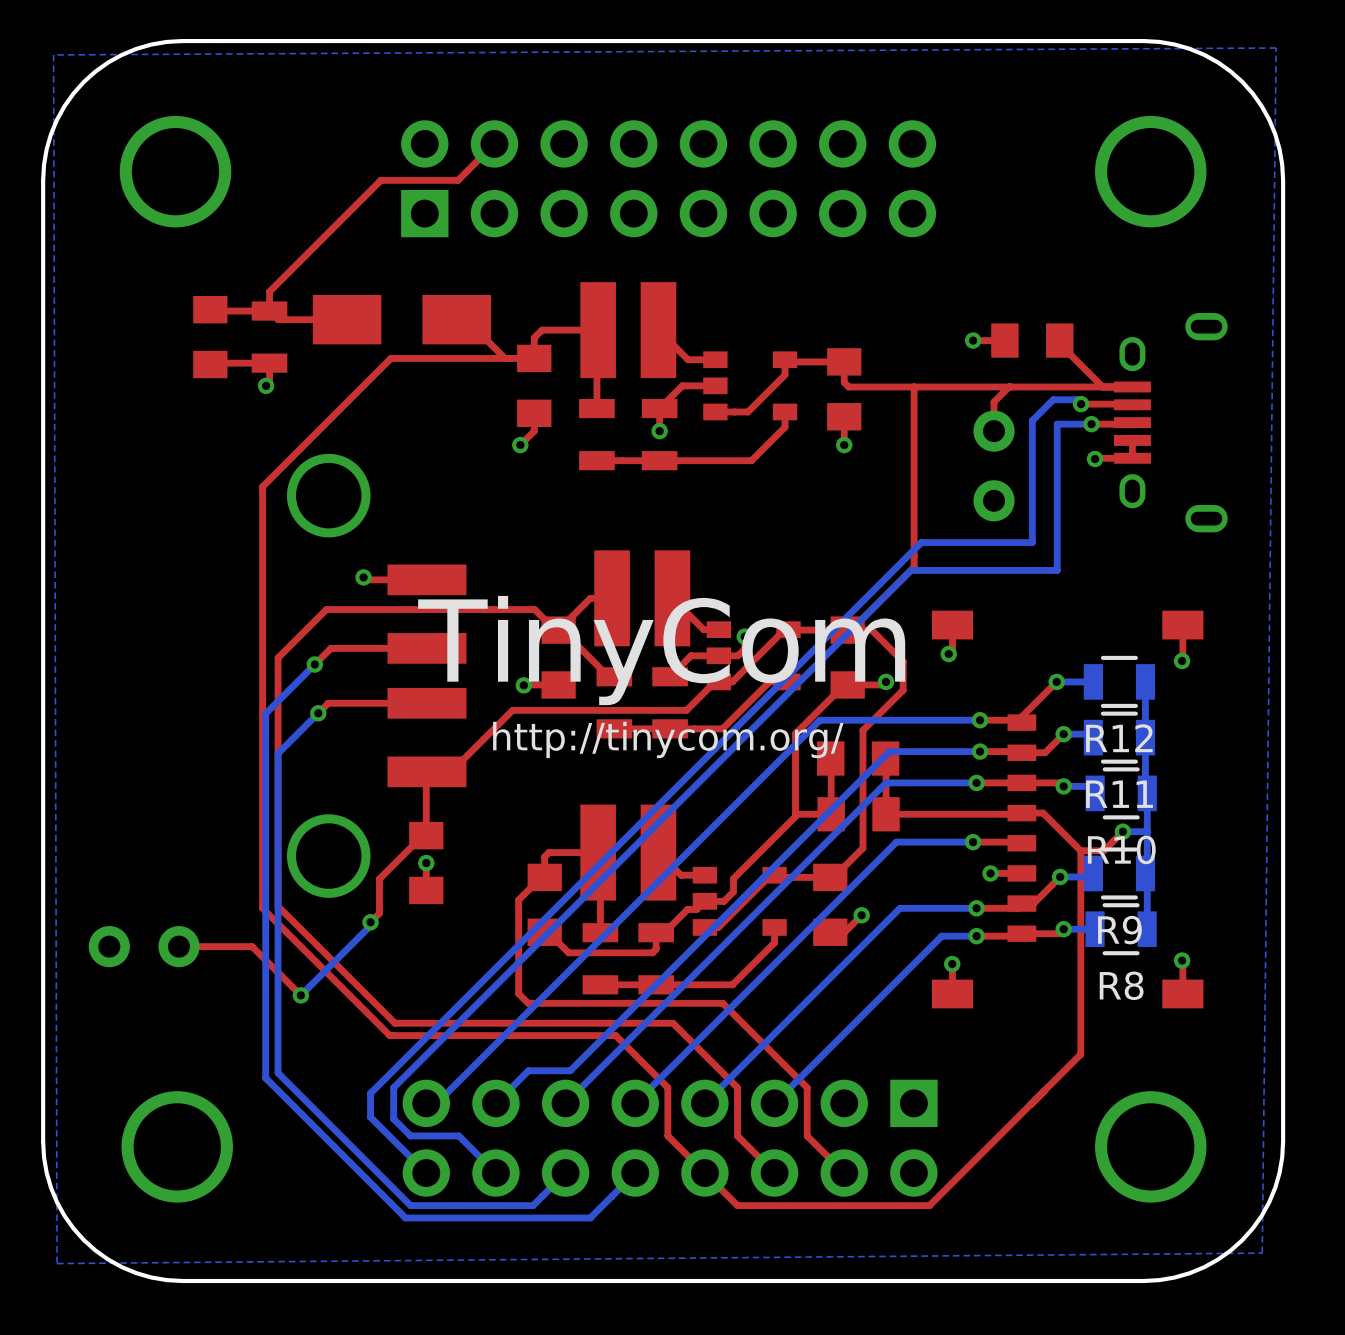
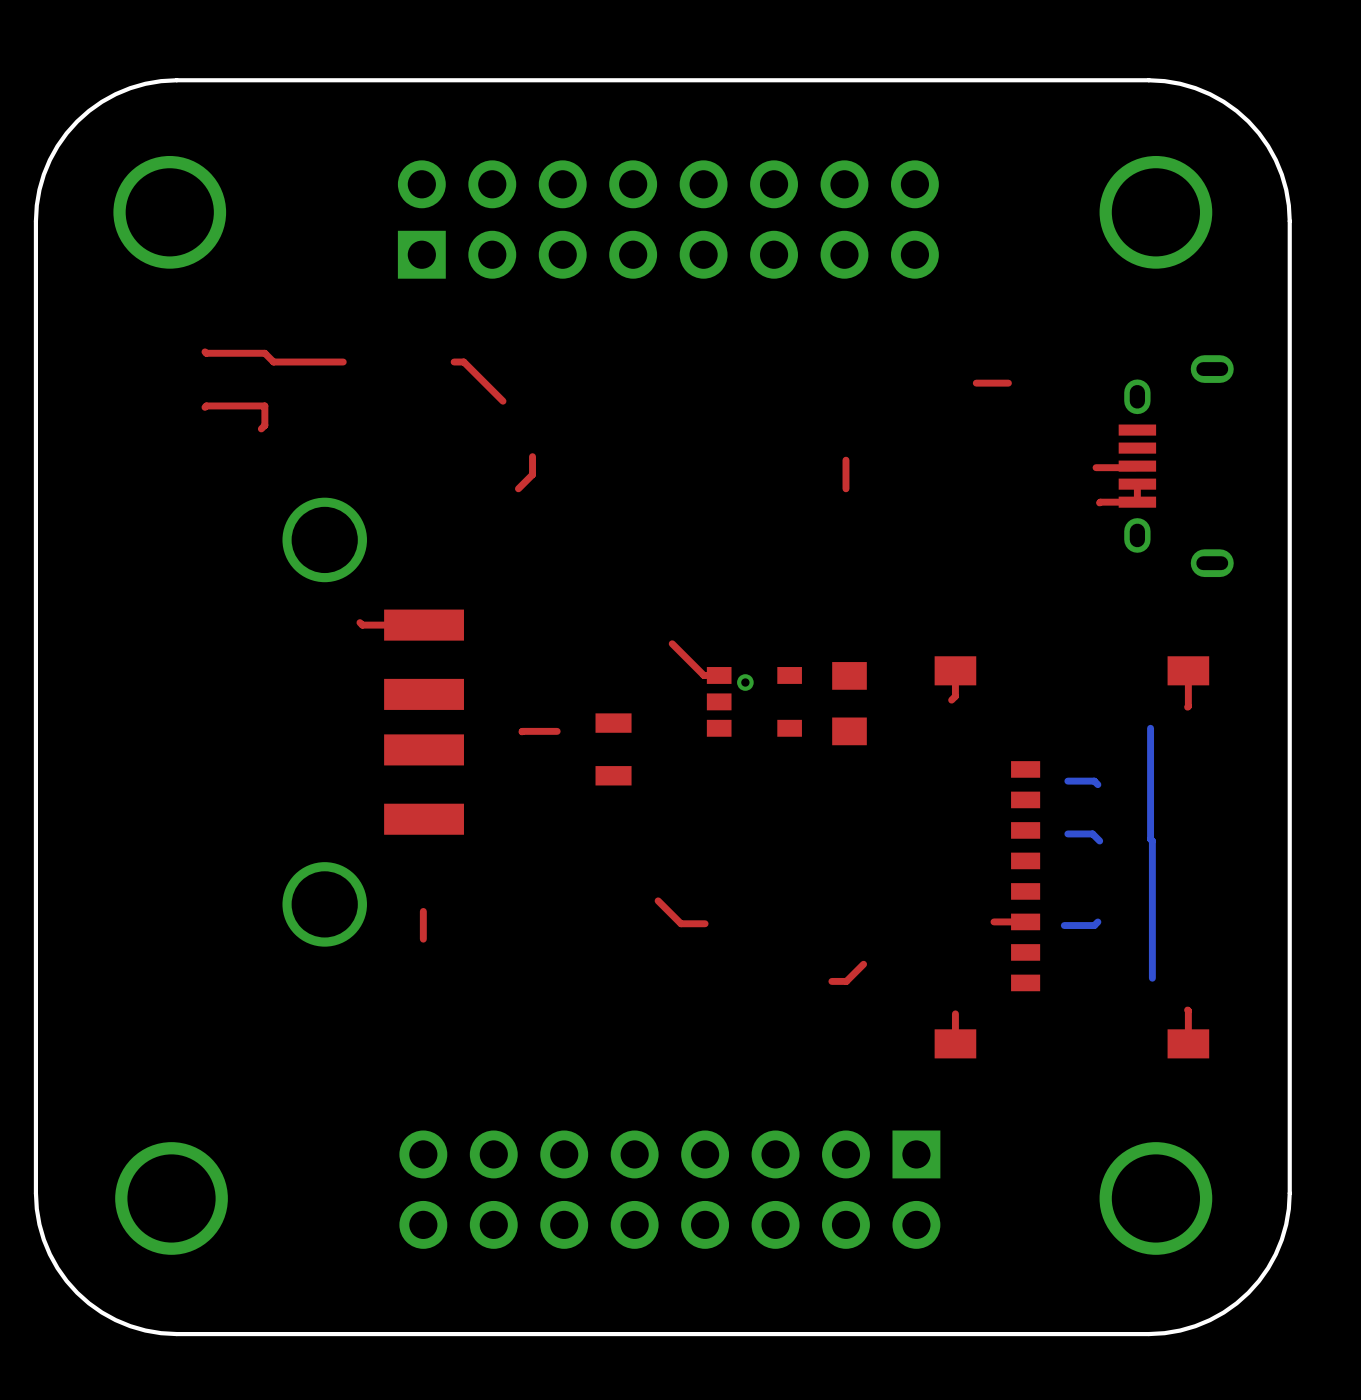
bottom zone outline: (1276, 48) (53, 54) (57, 1263) (1262, 1253) (1276, 48) -> none
top track: (494, 143) (458, 180) (380, 180) (269, 291) (269, 311) -> none
part: (401, 319) -> none
part: (628, 330) -> none
top track: (658, 330) (688, 359) (715, 359) -> none
part: (210, 337) -> none
part: (269, 337) -> none
via: (973, 340) -> none
part: (1032, 340) -> none
top track: (1059, 340) (1059, 344) (1102, 386) -> none
via: (266, 385) -> none
part: (534, 385) -> none
top track: (715, 385) (682, 385) (659, 408) (659, 431) -> none
part: (750, 385) -> none
top track: (914, 386) (914, 567) (851, 630) -> none
top track: (1009, 386) (994, 402) (994, 431) -> none
top track: (1132, 386) (848, 386) (844, 382) (844, 361) (787, 361) (785, 359) (785, 374) (748, 411) (715, 411) -> none
part: (844, 389) -> none
top track: (1081, 404) (1132, 404) -> none
bottom track: (1081, 404) (1076, 399) (1053, 399) (1032, 420) (1032, 542) (921, 542) (370, 1093) (370, 1117) (426, 1173) -> none
via: (1081, 404) -> none
top track: (596, 408) (598, 330) (541, 330) (534, 337) (534, 358) (390, 358) (262, 486) (262, 908) (389, 1035) (615, 1035) (667, 1087) (667, 1135) (737, 1205) (929, 1205) (1080, 1054) (1080, 850) -> none
top track: (781, 411) (785, 411) (785, 427) (751, 460) (596, 460) -> none
bottom track: (1091, 424) (1057, 424) (1057, 570) (910, 570) (393, 1087) (393, 1119) (410, 1135) (458, 1135) (495, 1173) -> none
via: (1091, 424) -> none
via: (659, 431) -> none
part: (596, 434) -> none
part: (659, 434) -> none
via: (520, 445) -> none
via: (844, 445) -> none
via: (1095, 459) -> none
part: (994, 465) -> none
via: (363, 577) -> none
top track: (612, 598) (590, 598) (558, 630) -> none
part: (642, 598) -> none
top track: (744, 636) (744, 648) (737, 655) (691, 655) (670, 676) -> none
top track: (426, 648) (330, 648) (314, 664) -> none
text: TinyCom (661, 650) -> none
via: (948, 654) -> none
part: (558, 657) -> none
via: (1182, 661) -> none
bottom track: (314, 664) (265, 713) (265, 1078) (405, 1217) (590, 1217) (635, 1173) -> none
via: (314, 664) -> none
top track: (614, 676) (608, 676) (562, 630) (555, 630) (534, 609) (326, 609) (278, 657) (278, 906) (394, 1023) (673, 1023) (737, 1087) (737, 1135) (774, 1173) -> none
top track: (788, 681) (769, 681) (722, 728) (614, 728) -> none
top track: (886, 681) (883, 684) (844, 684) (795, 733) (795, 816) (733, 878) (733, 891) (723, 901) (704, 901) (696, 909) (687, 909) (664, 932) (656, 932) (656, 949) (652, 952) (568, 952) (548, 932) (544, 932) -> none
via: (886, 681) -> none
top track: (1056, 681) (1021, 716) (1021, 722) (1019, 720) (980, 720) -> none
via: (1056, 681) -> none
bottom track: (1093, 681) (1056, 681) -> none
R12: (1119, 681) -> none
via: (523, 685) -> none
part: (670, 702) -> none
top track: (426, 703) (328, 703) (318, 713) -> none
bottom track: (318, 713) (278, 753) (278, 1073) (410, 1205) (533, 1205) (565, 1173) -> none
via: (318, 713) -> none
bottom track: (980, 720) (819, 720) (436, 1103) (426, 1103) -> none
via: (980, 720) -> none
top track: (1063, 734) (1045, 752) (980, 751) -> none
via: (1063, 734) -> none
R11: (1119, 737) -> none
text: http://tinycom.org/ (668, 739) -> none
bottom track: (980, 751) (889, 751) (570, 1070) (528, 1070) (495, 1103) -> none
via: (980, 751) -> none
top track: (830, 758) (831, 814) (795, 814) -> none
part: (858, 758) -> none
top track: (885, 758) (886, 814) (1021, 813) -> none
top track: (976, 782) (1060, 782) (1063, 786) -> none
bottom track: (976, 782) (886, 782) (565, 1103) -> none
via: (976, 782) -> none
via: (1063, 786) -> none
R10: (1121, 793) -> none
top track: (1021, 813) (1043, 813) (1080, 850) -> none
part: (858, 814) -> none
top track: (1122, 831) (1103, 850) (1080, 850) -> none
via: (1122, 831) -> none
bottom track: (1147, 831) (1122, 831) -> none
top track: (973, 842) (1021, 843) -> none
bottom track: (973, 842) (896, 842) (635, 1103) -> none
via: (973, 842) -> none
part: (628, 852) -> none
part: (426, 863) -> none
via: (426, 863) -> none
via: (990, 873) -> none
R9: (1119, 873) -> none
top track: (1060, 876) (1033, 903) (1021, 903) (1017, 908) (976, 908) -> none
via: (1060, 876) -> none
part: (739, 901) -> none
part: (544, 904) -> none
part: (830, 904) -> none
bottom track: (976, 908) (899, 908) (704, 1103) -> none
via: (976, 908) -> none
via: (861, 915) -> none
top track: (370, 922) (379, 913) (379, 879) (422, 835) (426, 835) (426, 772) (451, 771) (512, 710) (686, 710) (715, 681) (732, 681) (784, 629) (871, 630) (903, 661) (903, 690) (862, 730) (862, 848) (833, 877) (776, 877) (770, 875) (718, 927) (704, 927) -> none
bottom track: (370, 922) (370, 925) (300, 995) -> none
via: (370, 922) -> none
top track: (774, 927) (774, 942) (732, 984) (600, 984) -> none
top track: (1063, 929) (1059, 933) (976, 936) -> none
via: (1063, 929) -> none
bottom track: (1095, 929) (1063, 929) -> none
R8: (1121, 929) -> none
top track: (600, 932) (600, 854) (598, 852) (548, 852) (544, 856) (544, 877) (541, 877) (518, 900) (518, 993) (528, 1003) (722, 1003) (807, 1087) (807, 1135) (844, 1173) -> none
bottom track: (976, 936) (941, 936) (774, 1103) -> none
via: (976, 936) -> none
part: (144, 946) -> none
top track: (178, 946) (252, 946) (300, 995) -> none
part: (600, 958) -> none
part: (656, 958) -> none
via: (1182, 960) -> none
via: (952, 964) -> none
via: (300, 995) -> none

